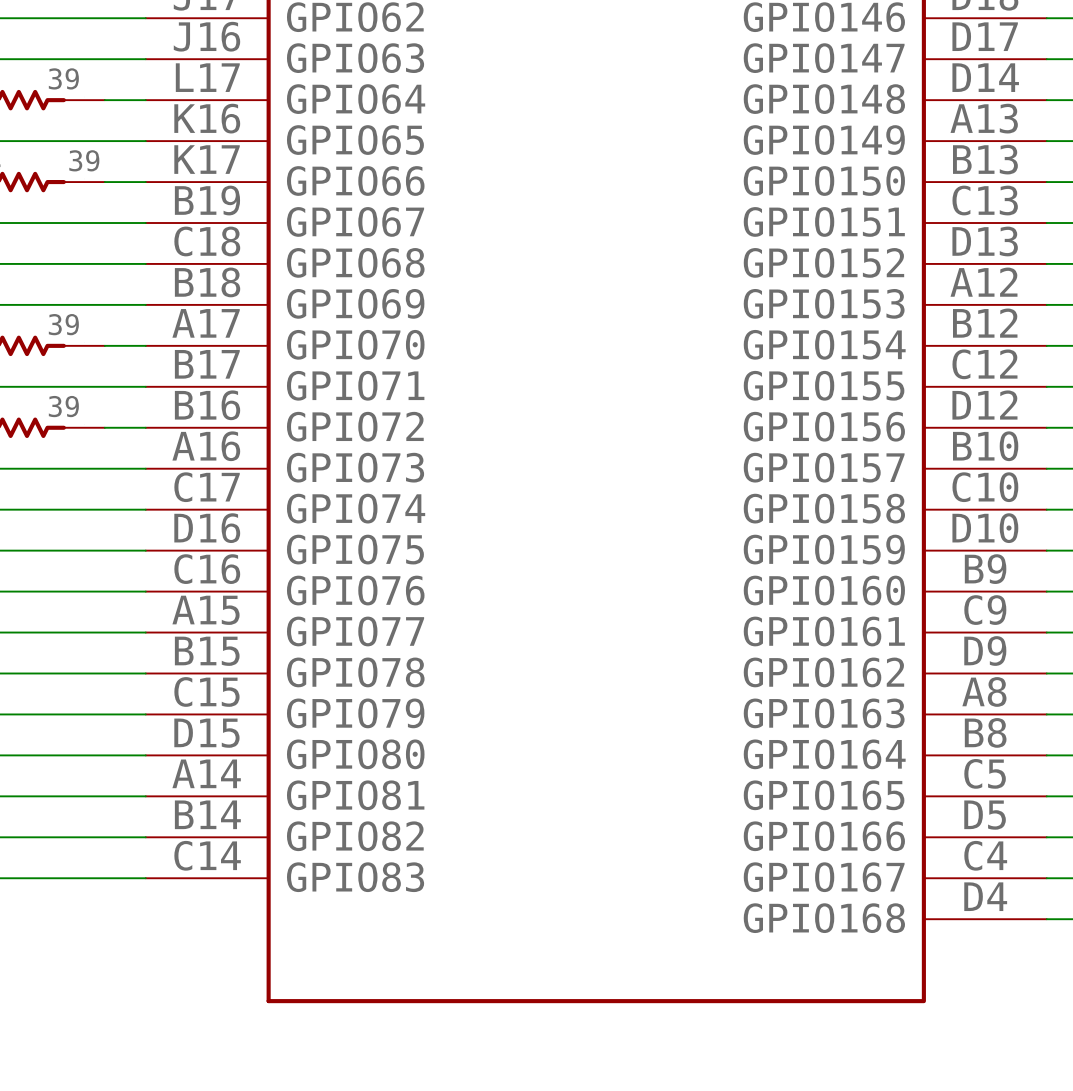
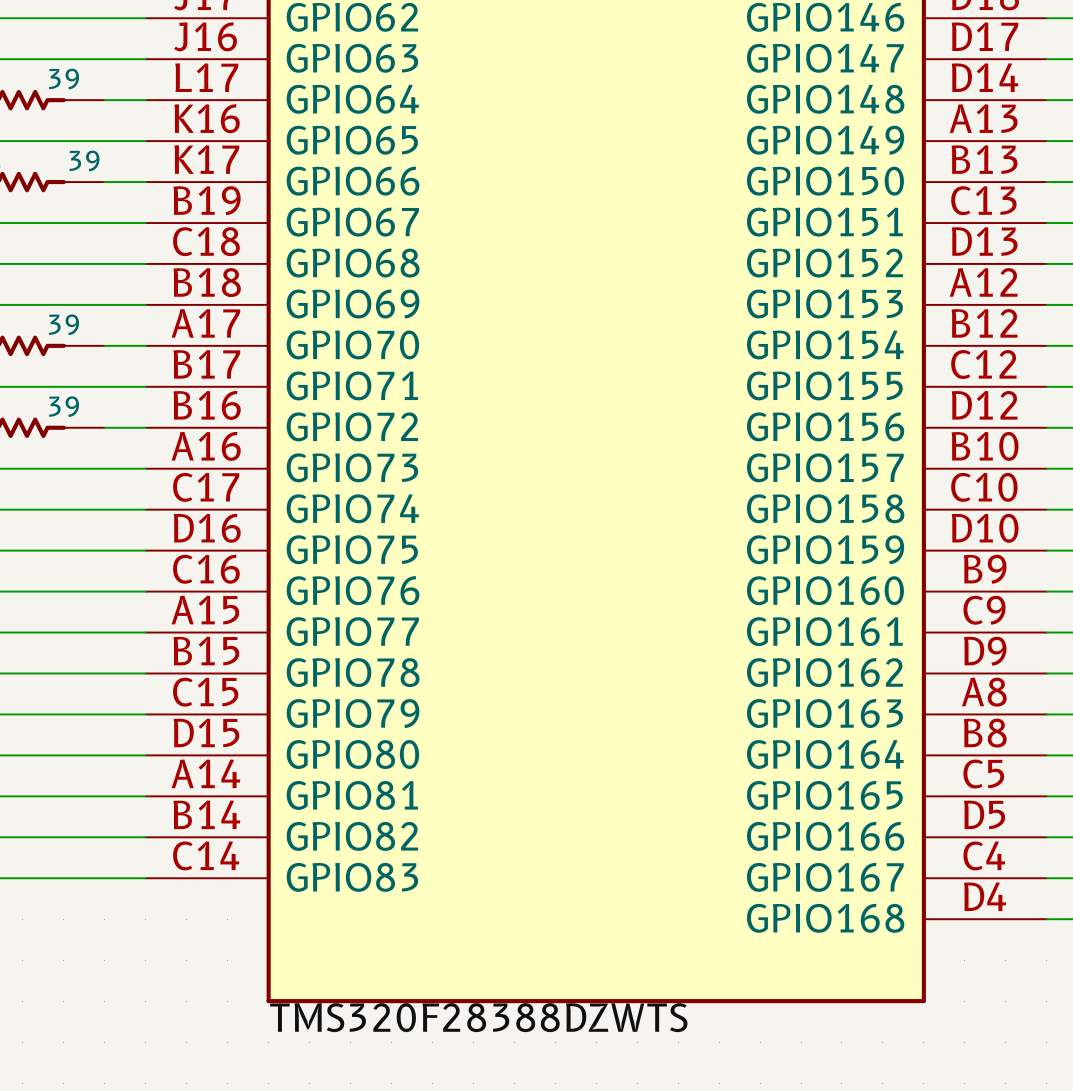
label: none -> TMS320F28388DZWTS (478, 1017)

